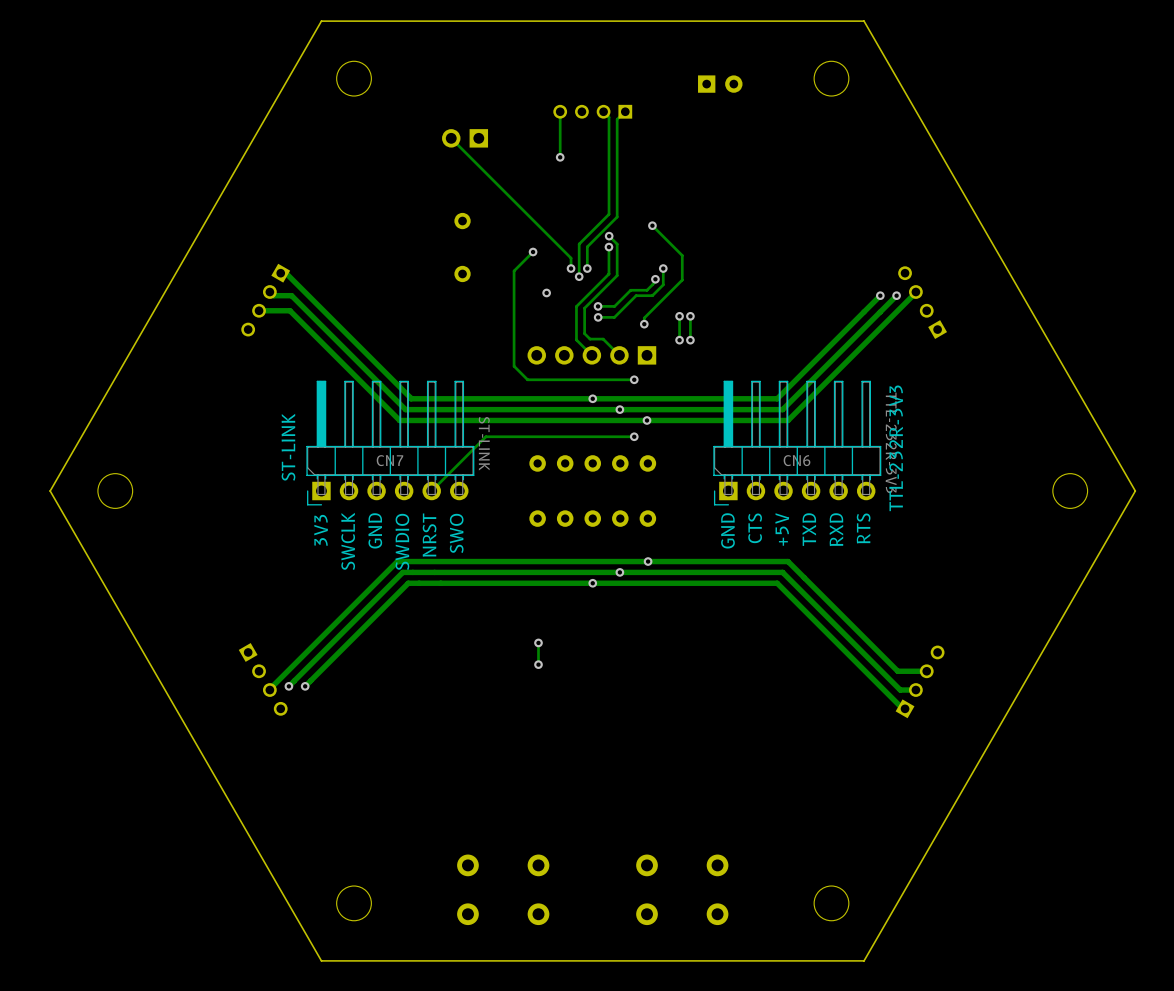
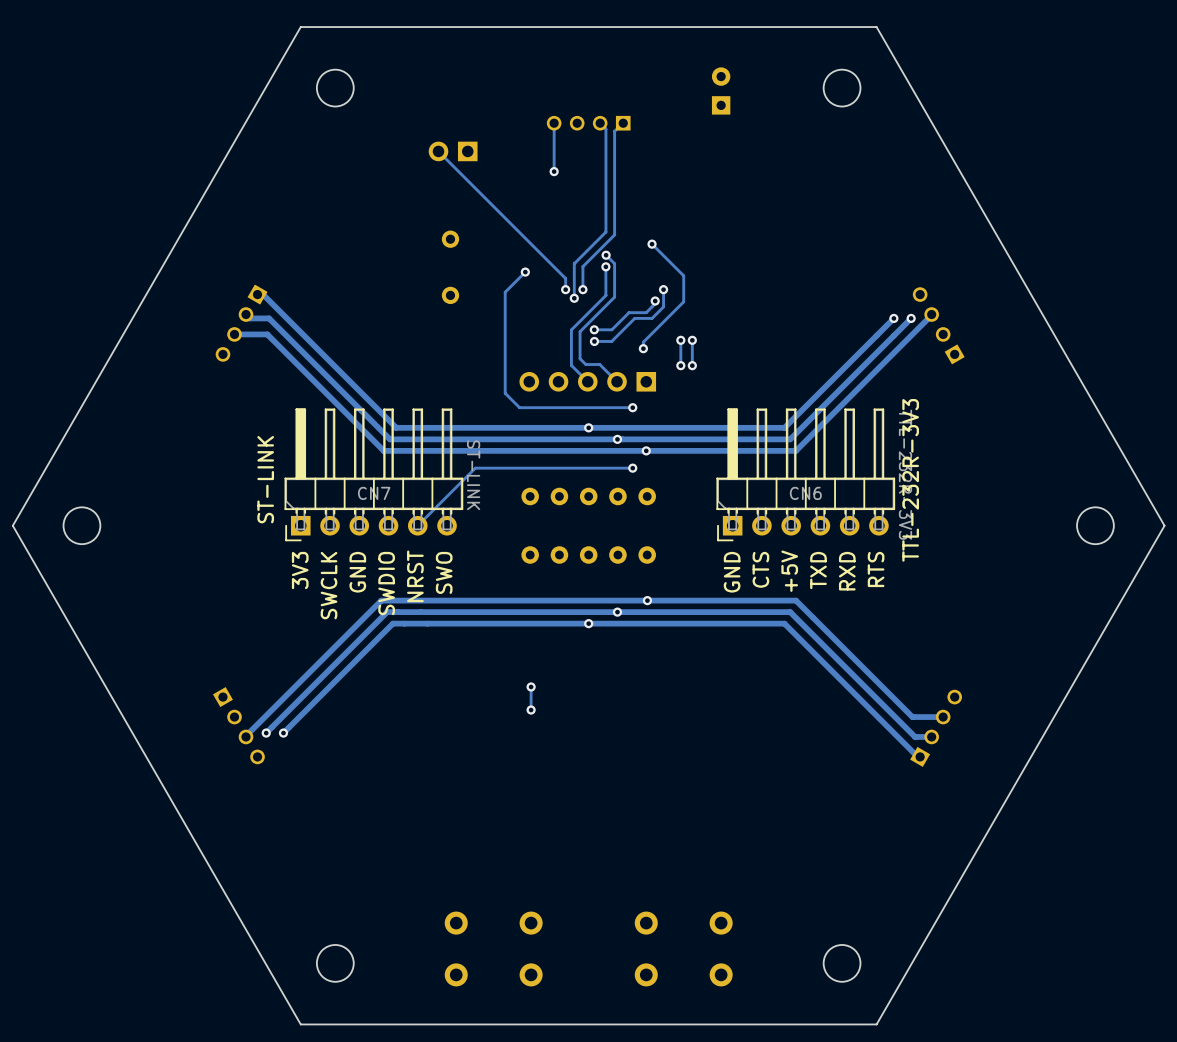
part rotation: 0° (720, 84) -> 90° counterclockwise (721, 90)
via: (546, 292) -> none

